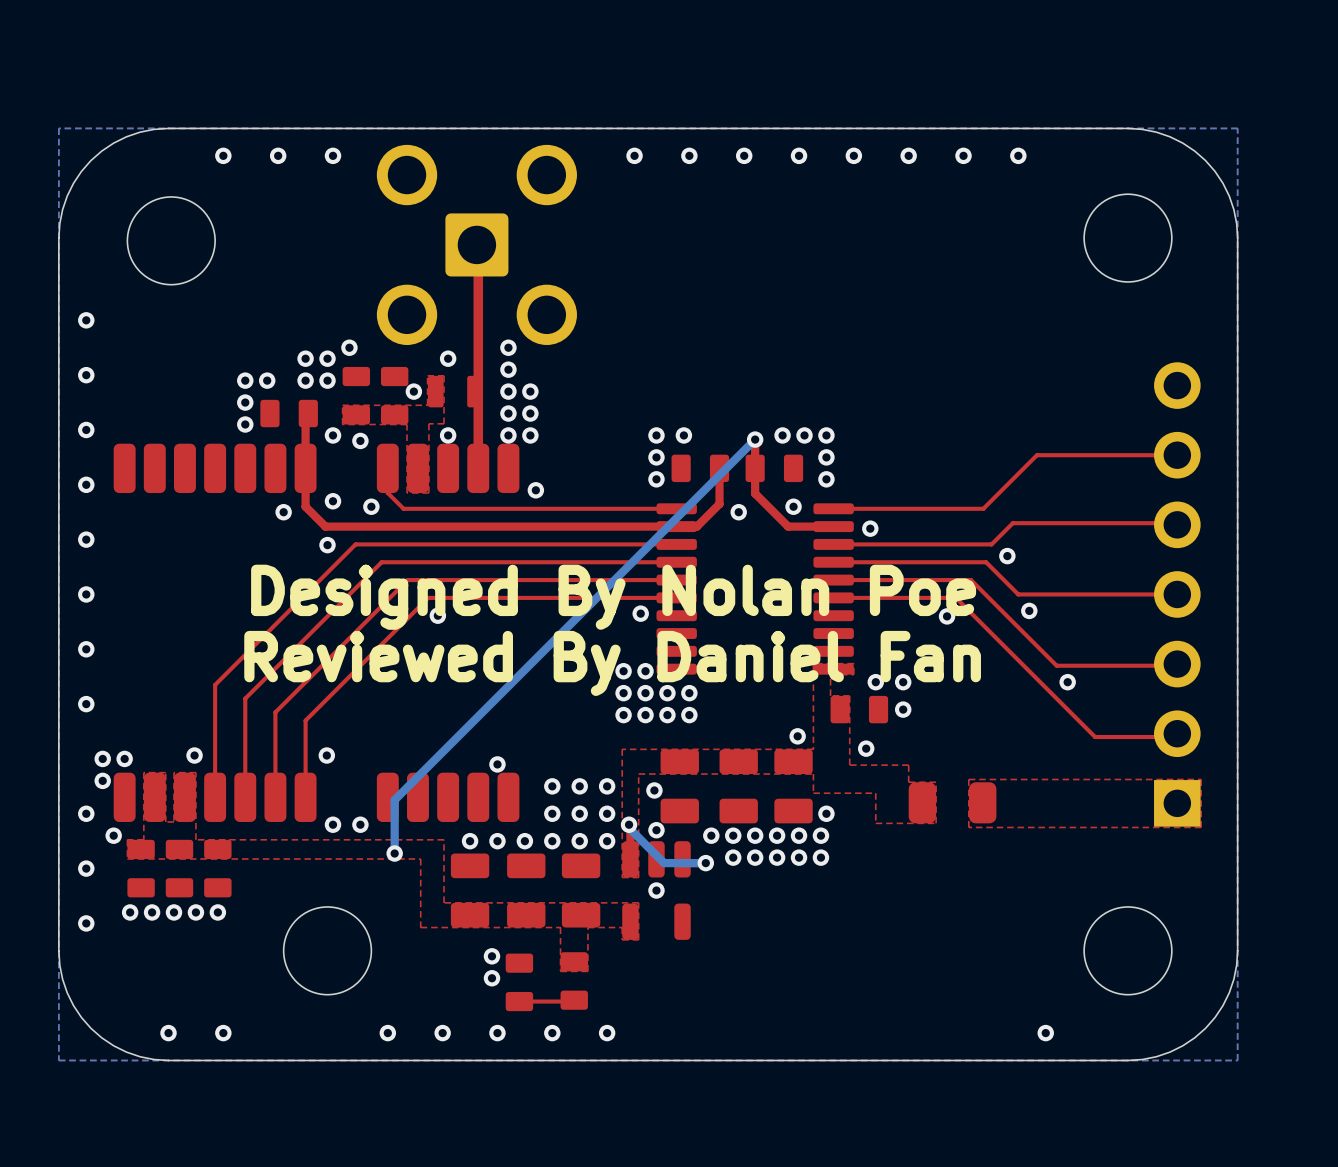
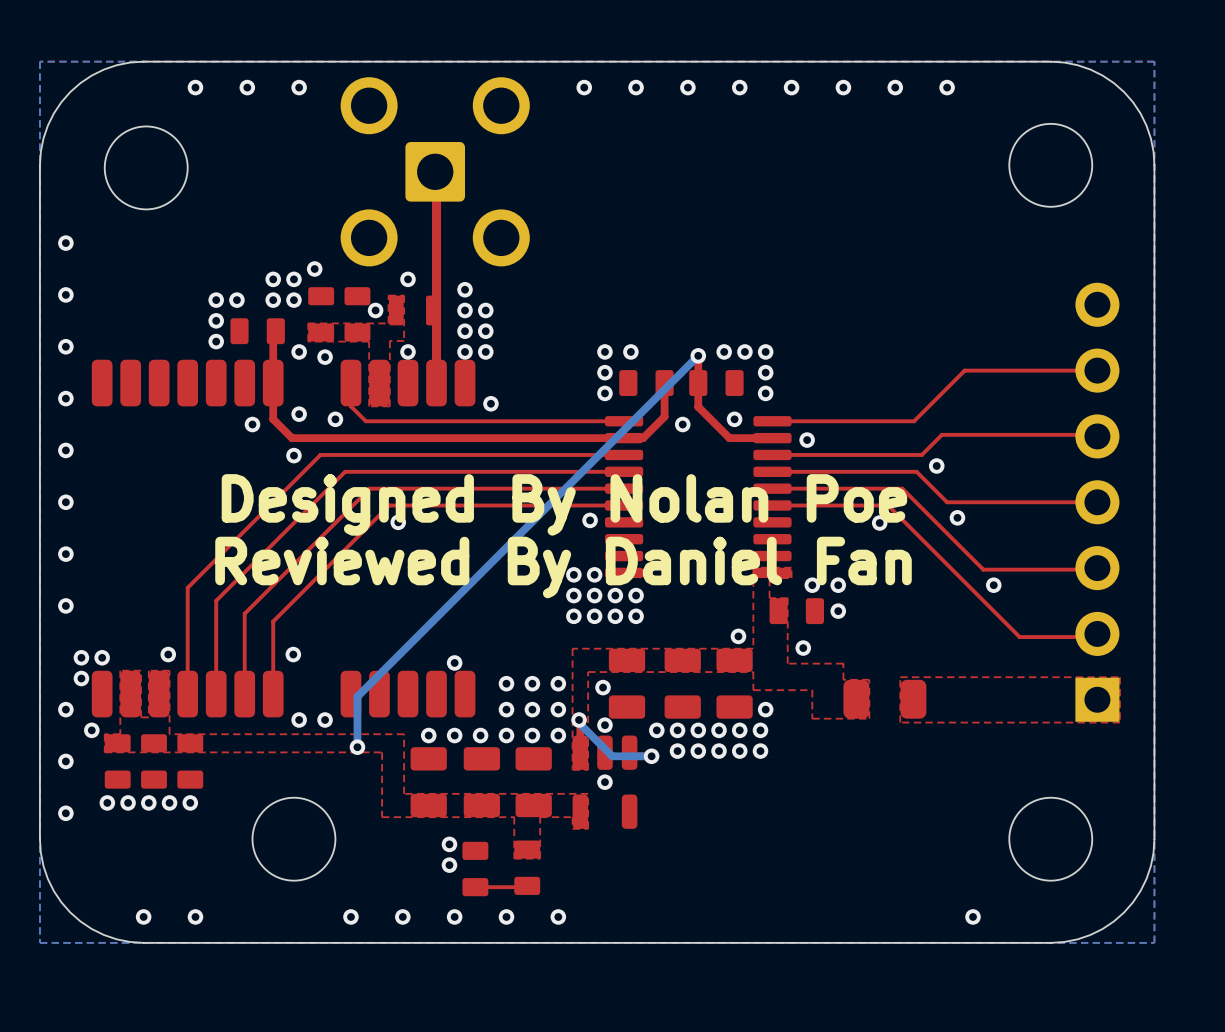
via: (508, 347) -> none

